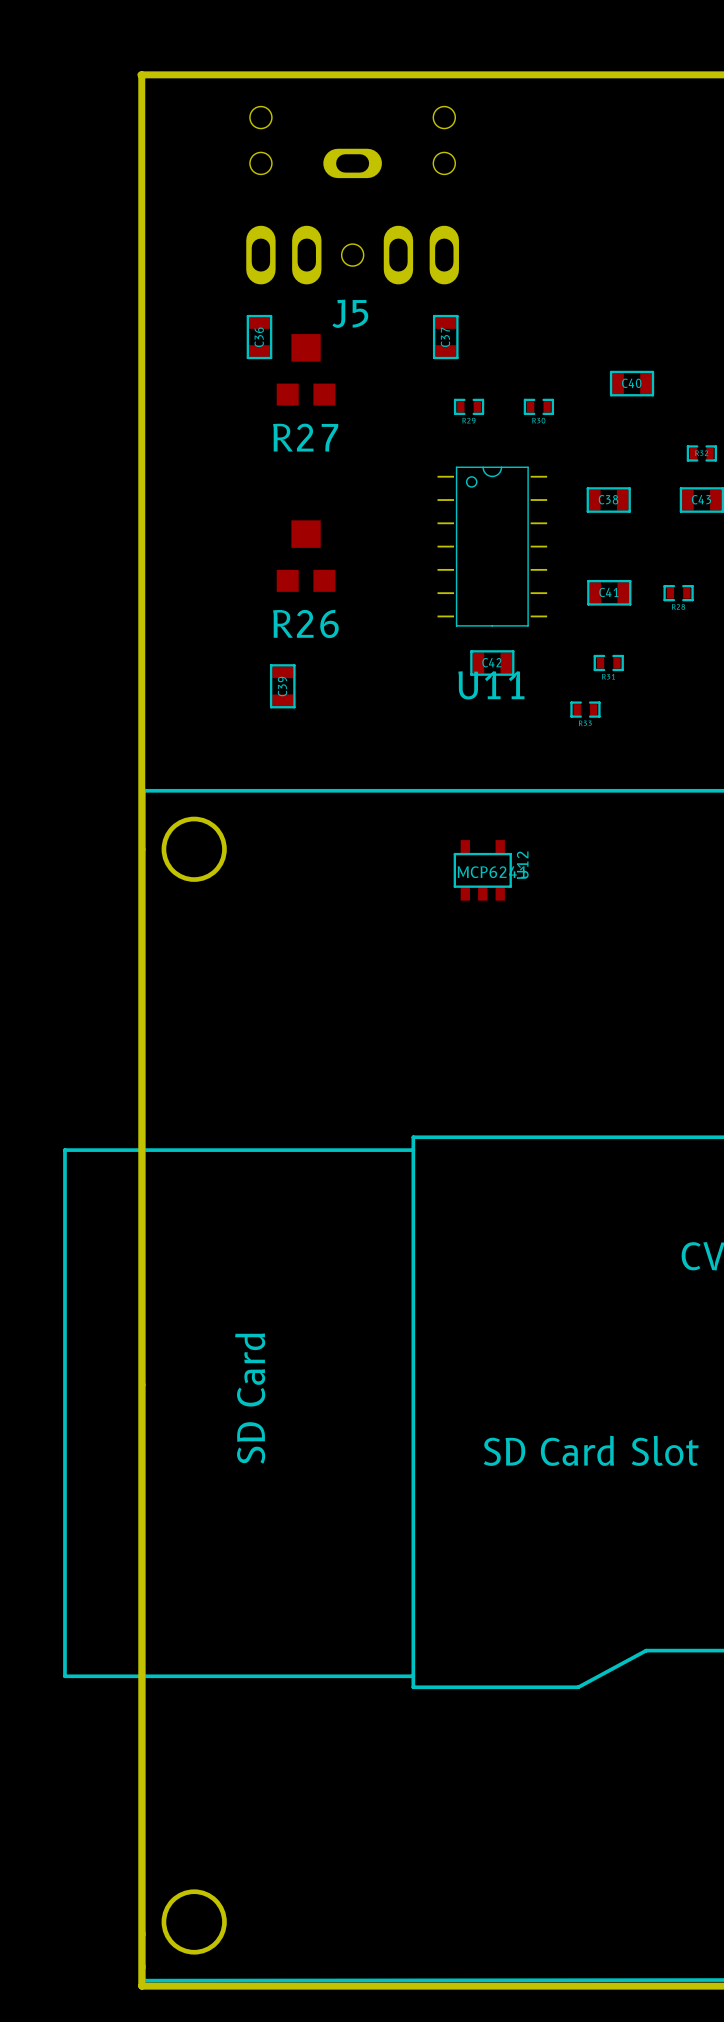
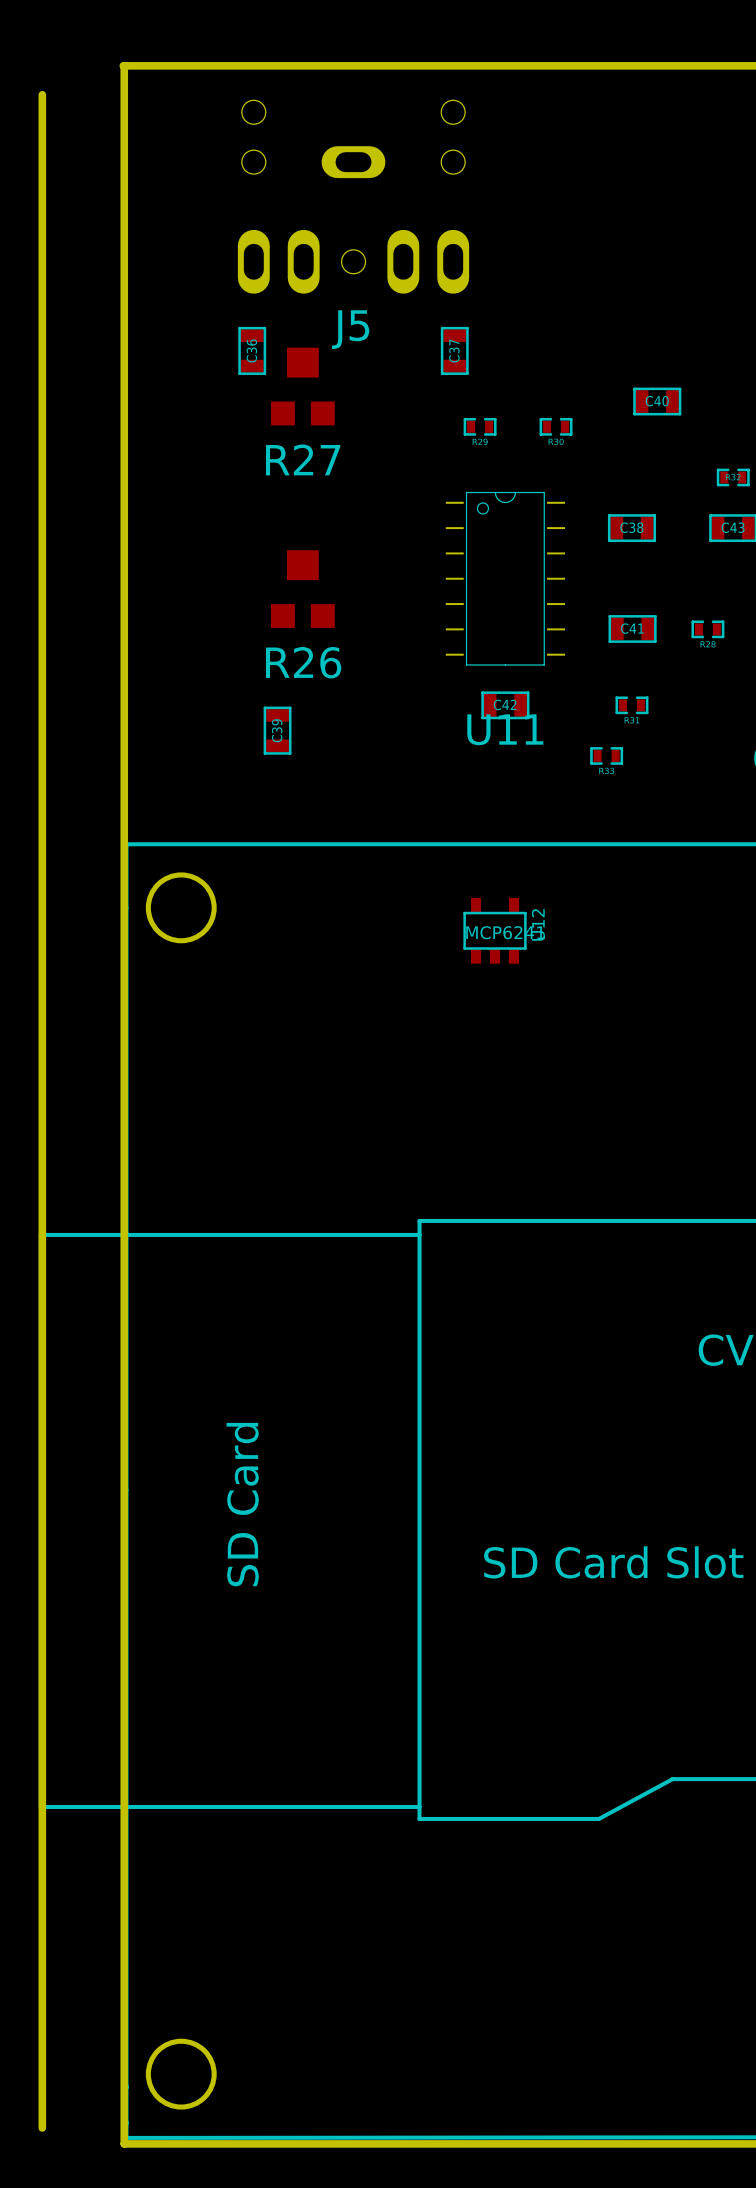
board edge: none -> (42, 94) (42, 2128)

